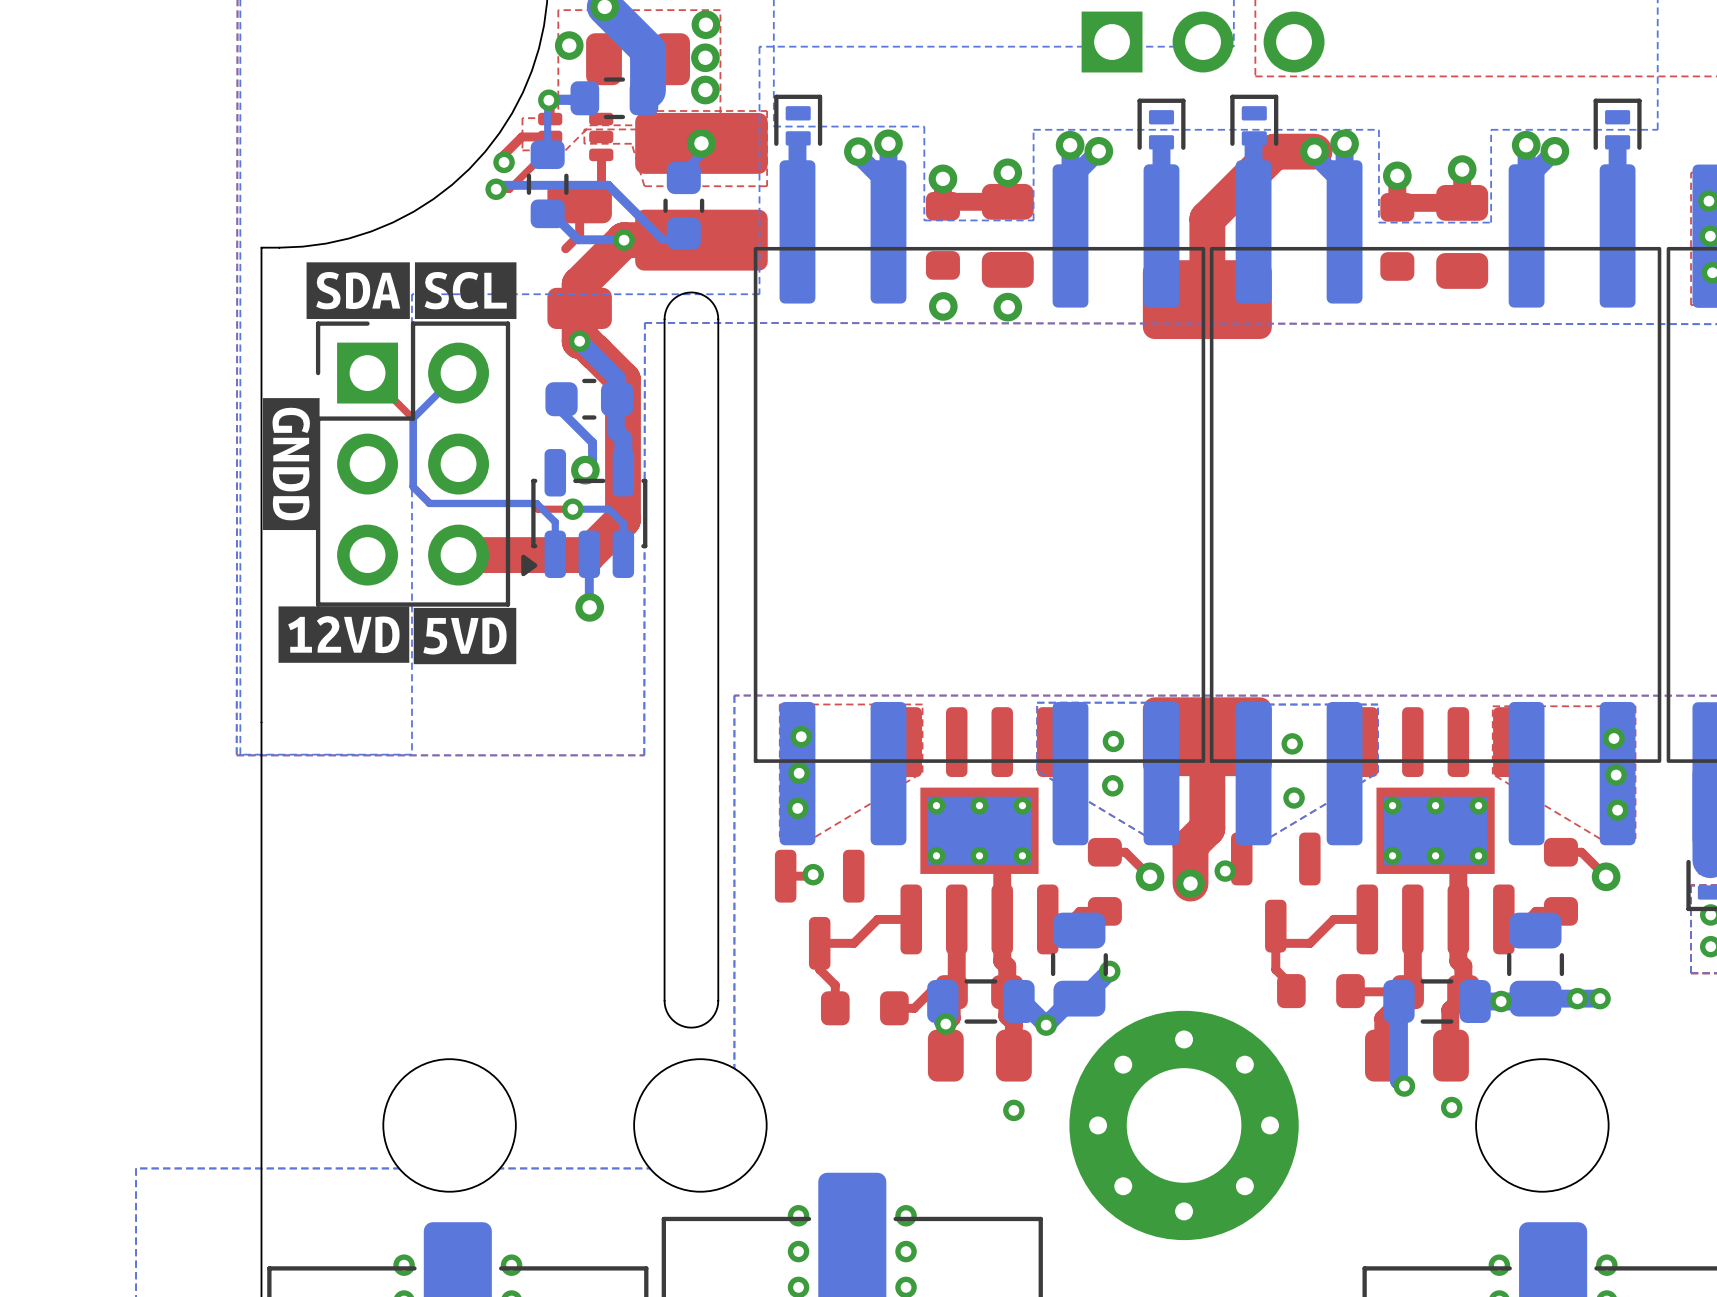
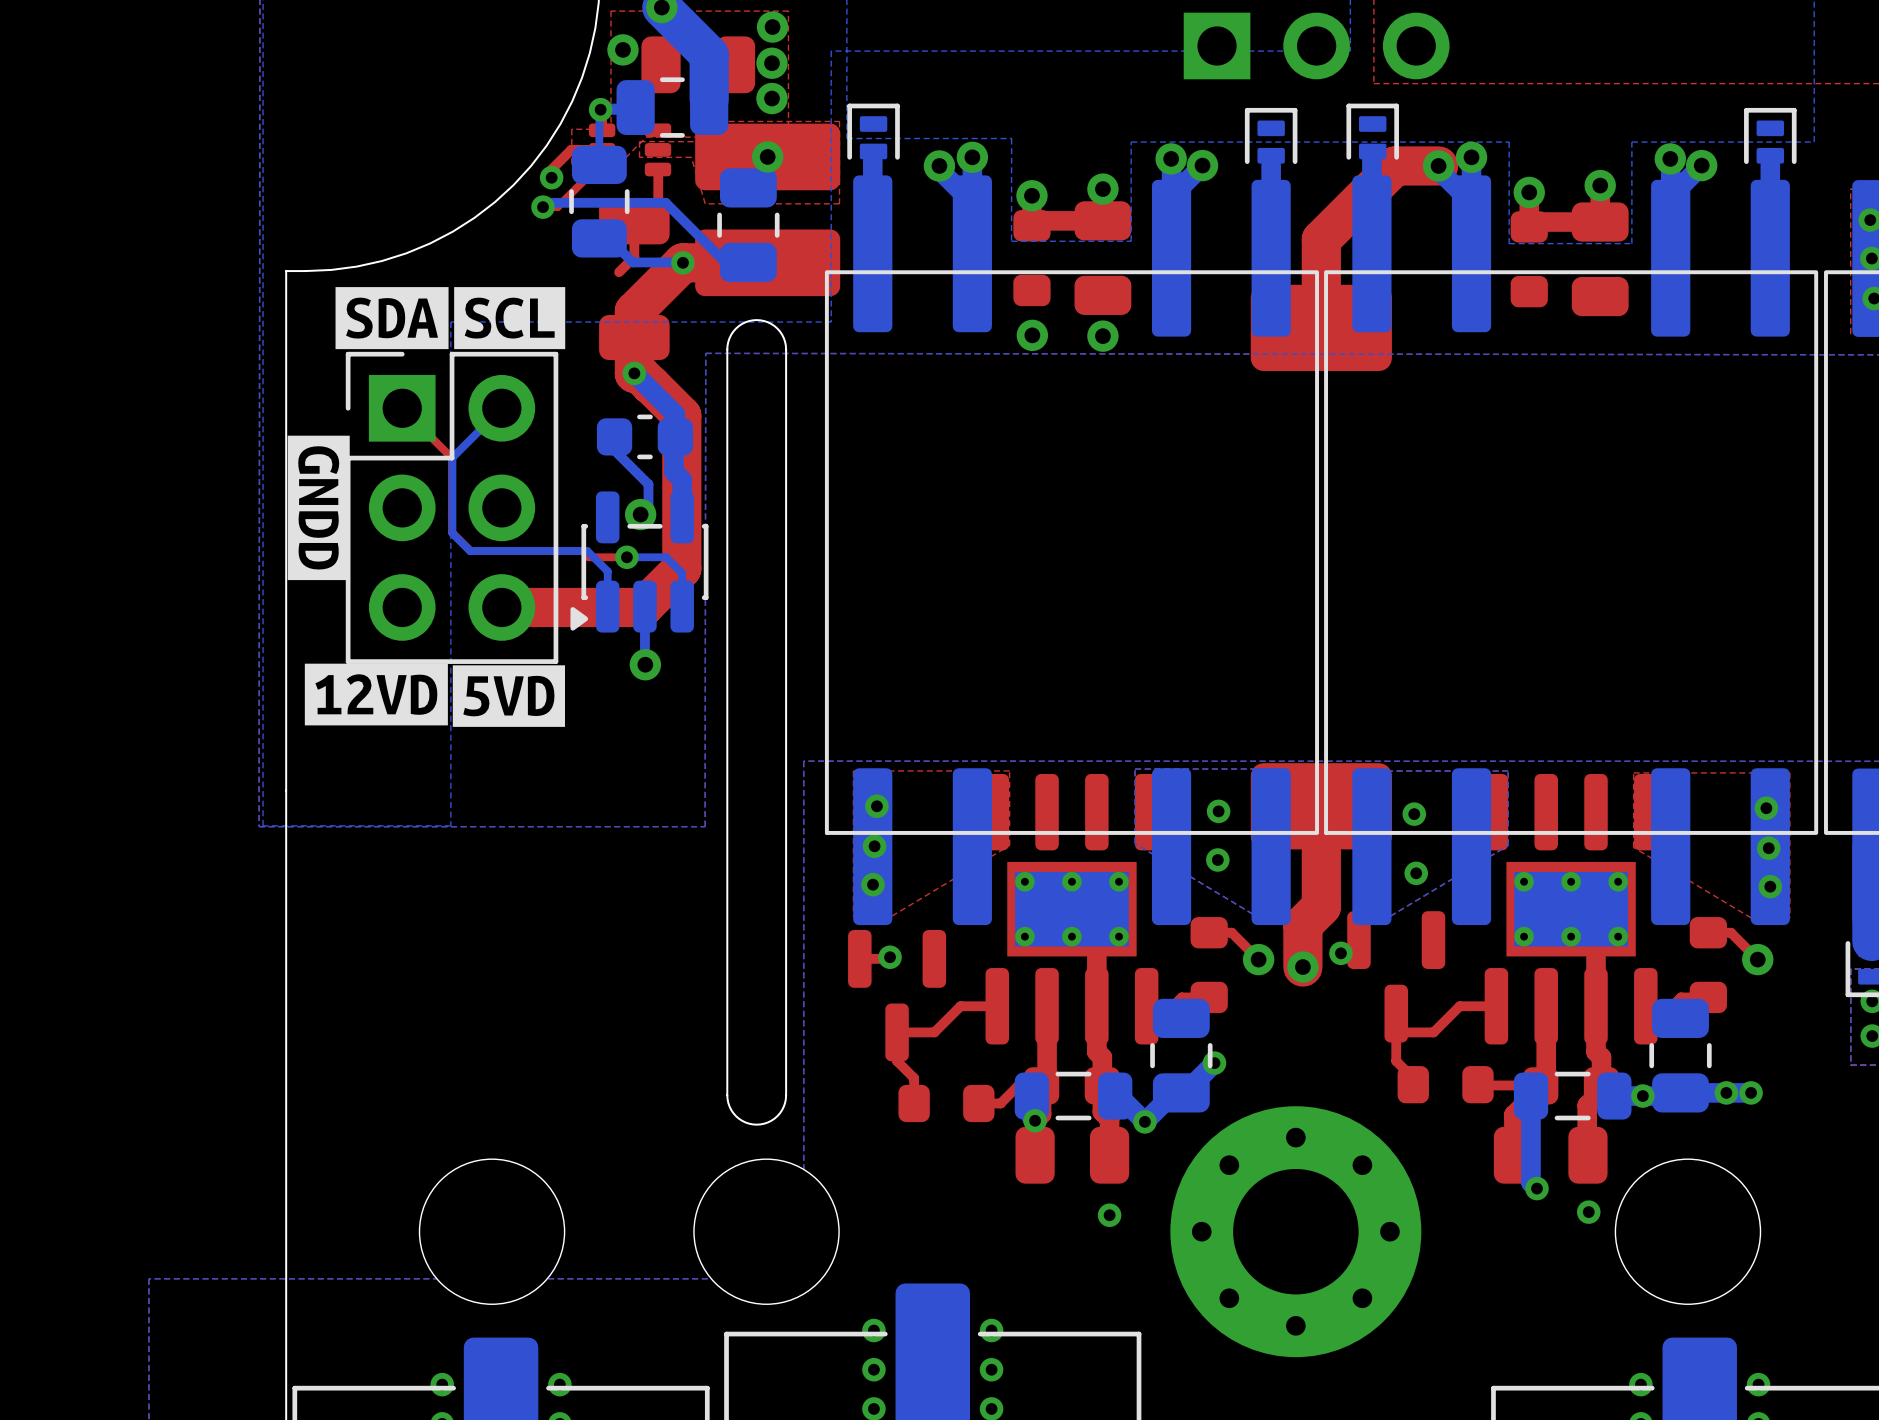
part footprint: [570, 77, 659, 120] -> [616, 77, 729, 138]
part footprint: [526, 140, 569, 229] -> [569, 145, 630, 258]
part footprint: [663, 161, 705, 250] -> [717, 168, 780, 283]

